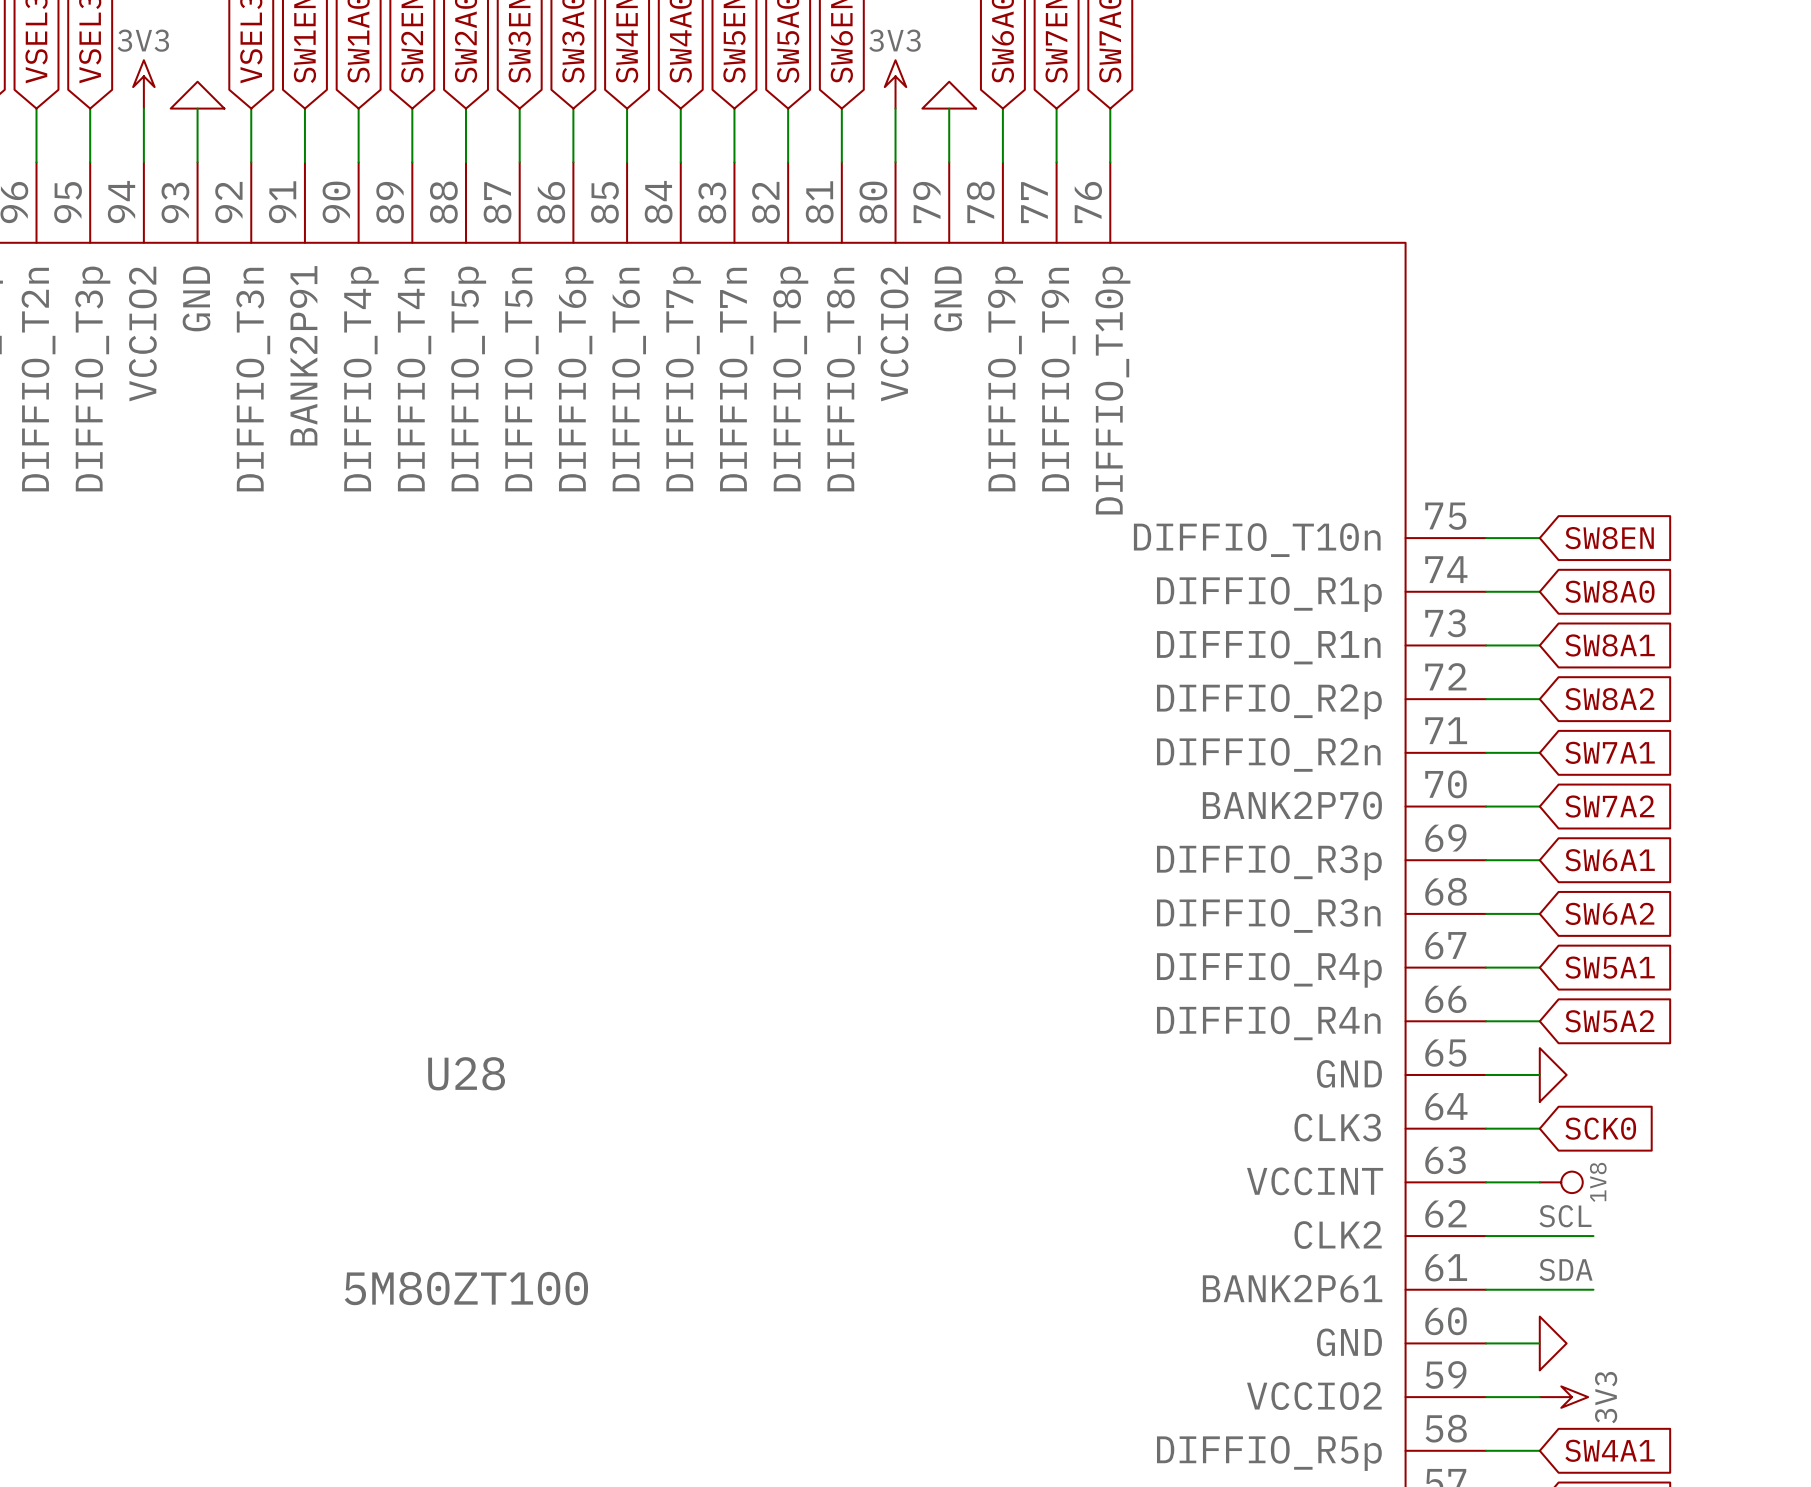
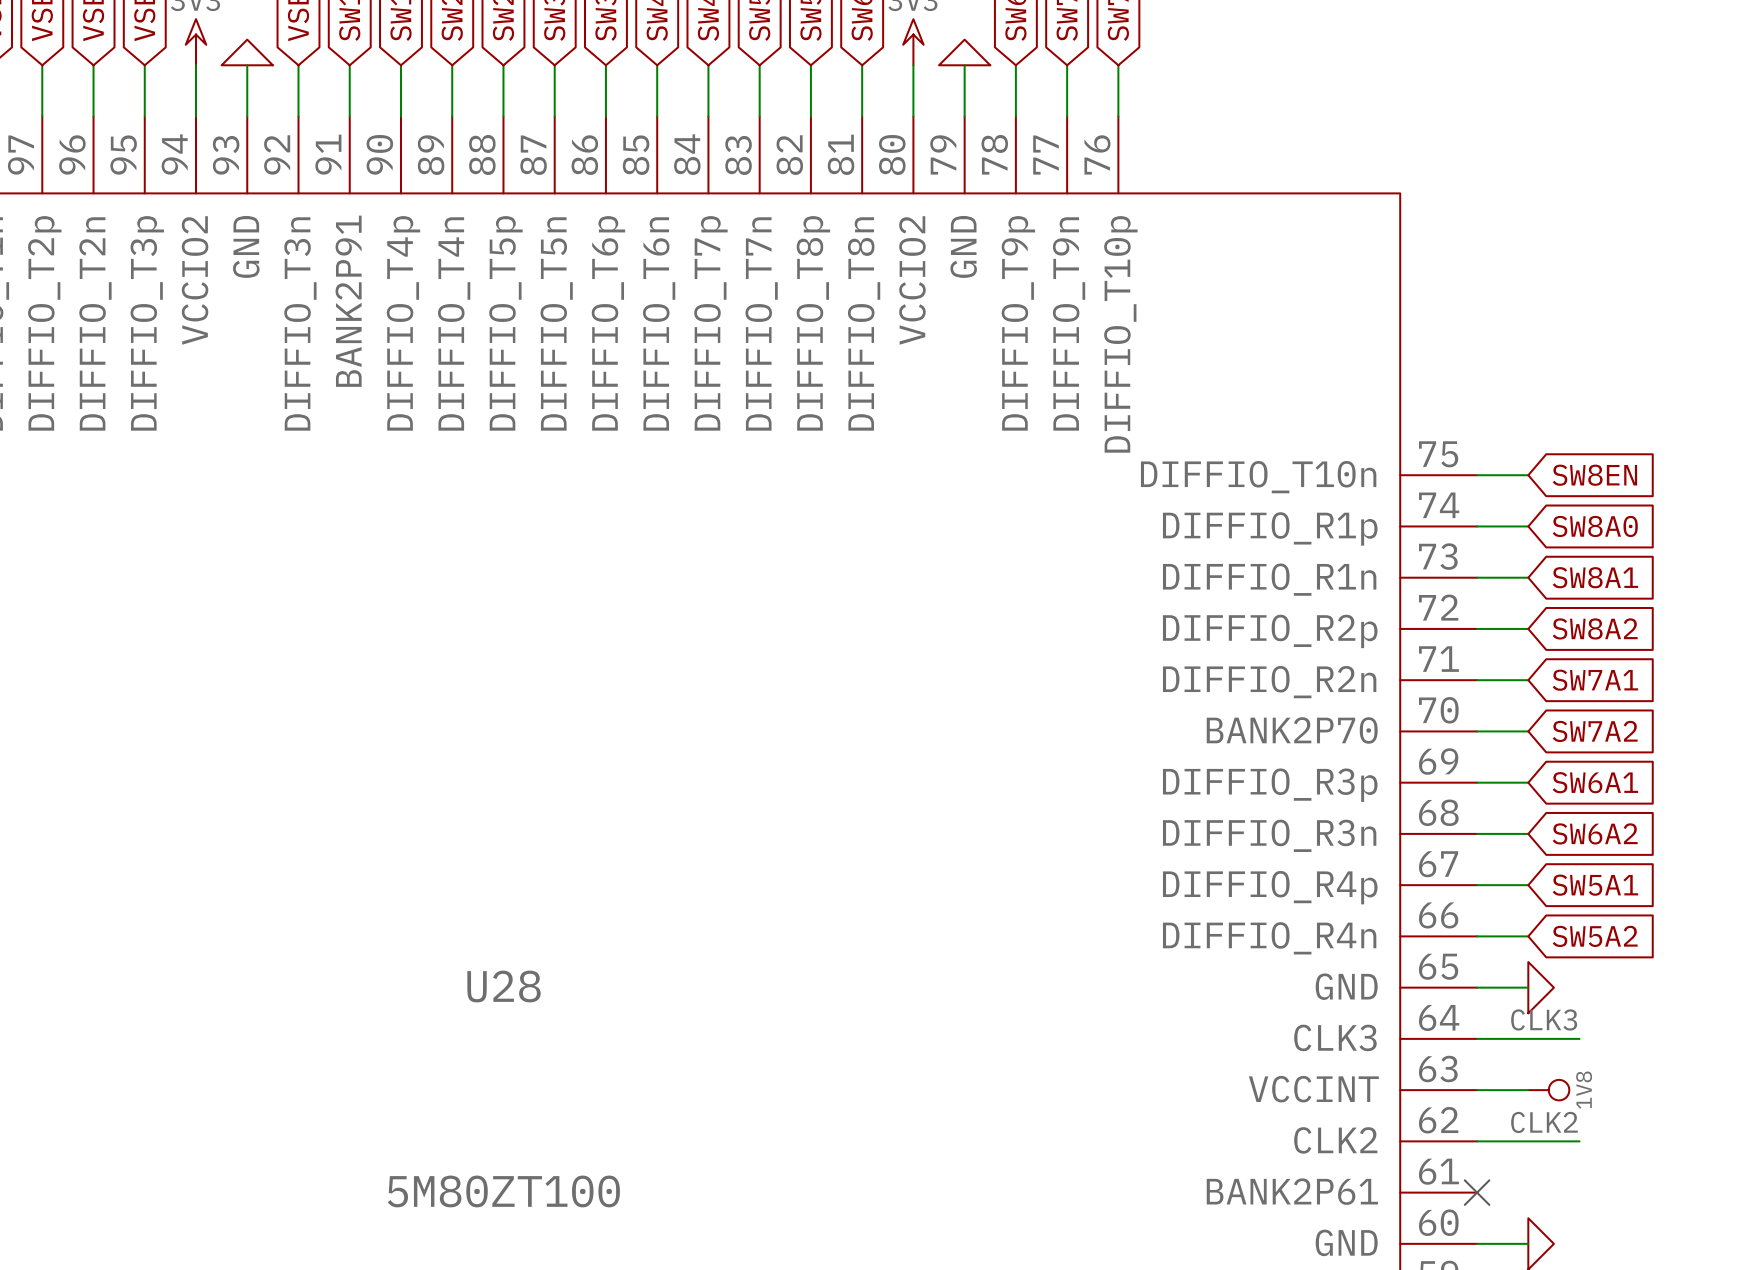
label: none -> CLK3 (1544, 1019)
wire: none -> (1528, 1038) (1579, 1038)
global label: SCK0 (1600, 1128) -> none
label: SCL (1565, 1216) -> CLK2 (1544, 1122)
label: SDA (1566, 1269) -> none
wire: (1486, 1289) (1593, 1289) -> none
no-connect mark: none -> (1477, 1192)

